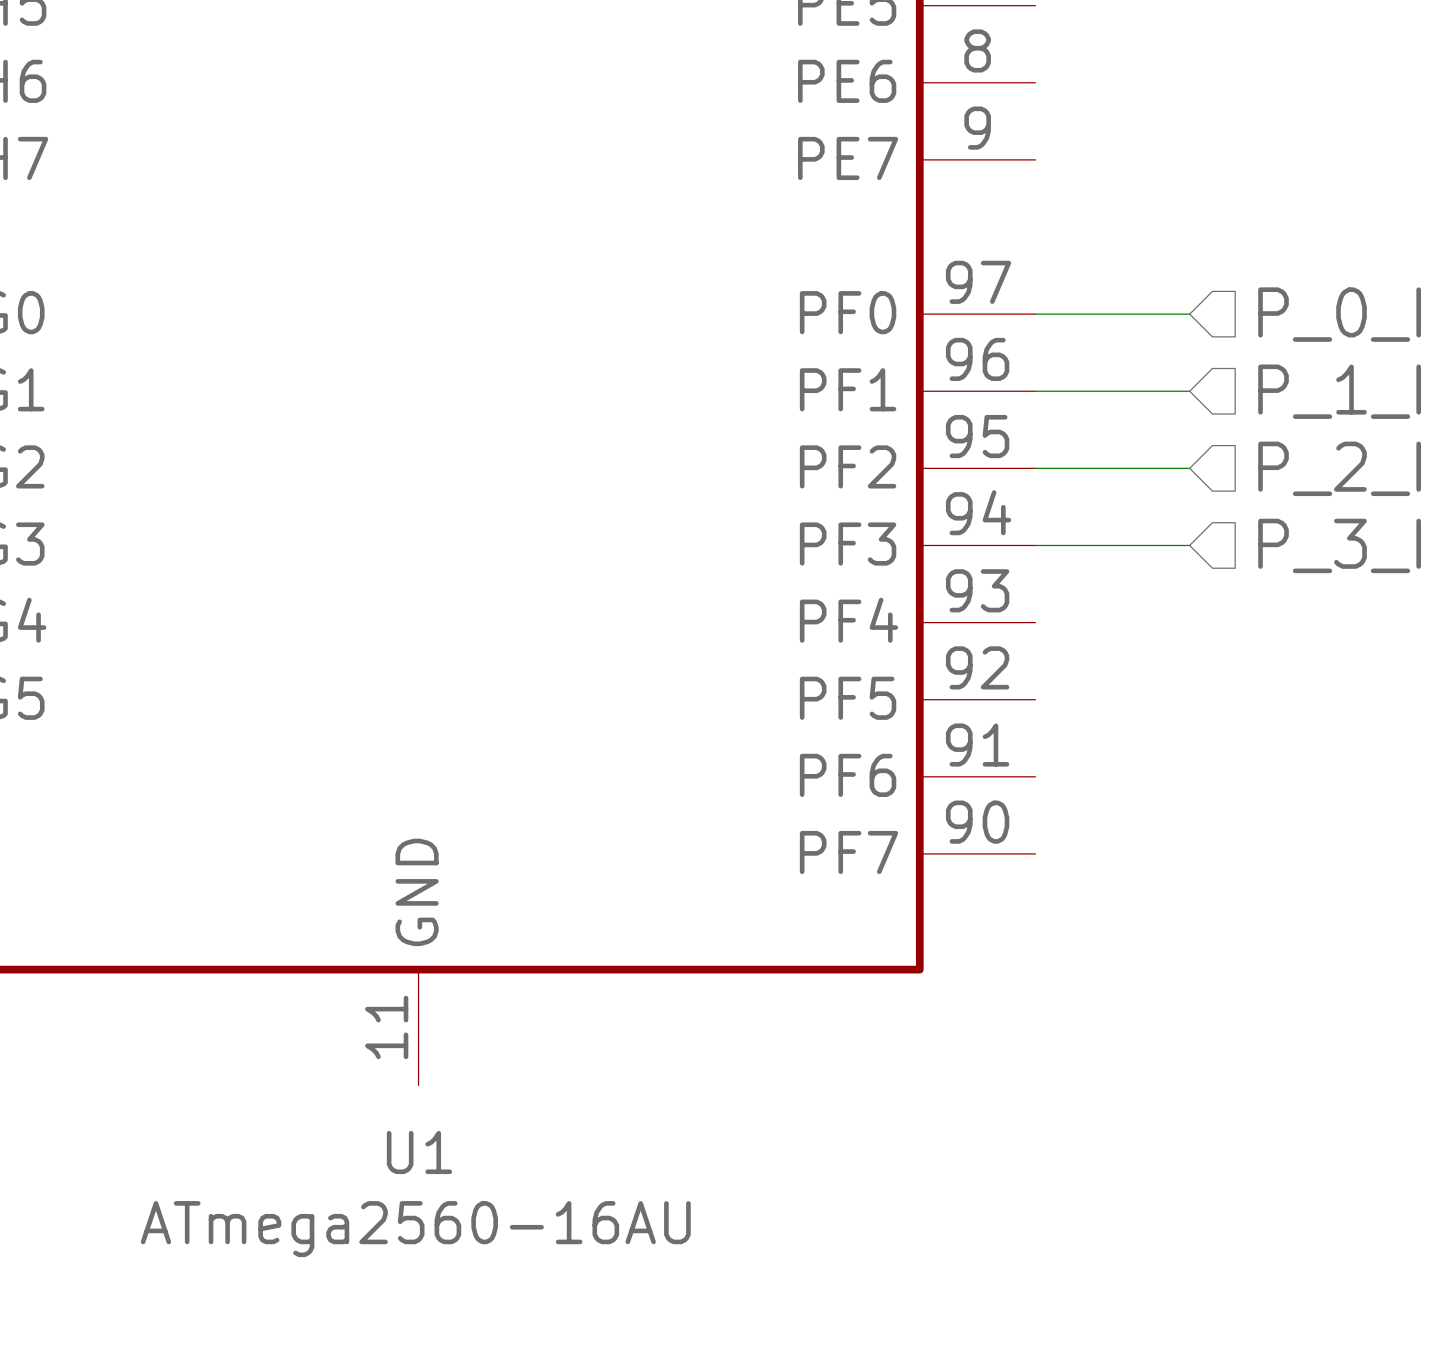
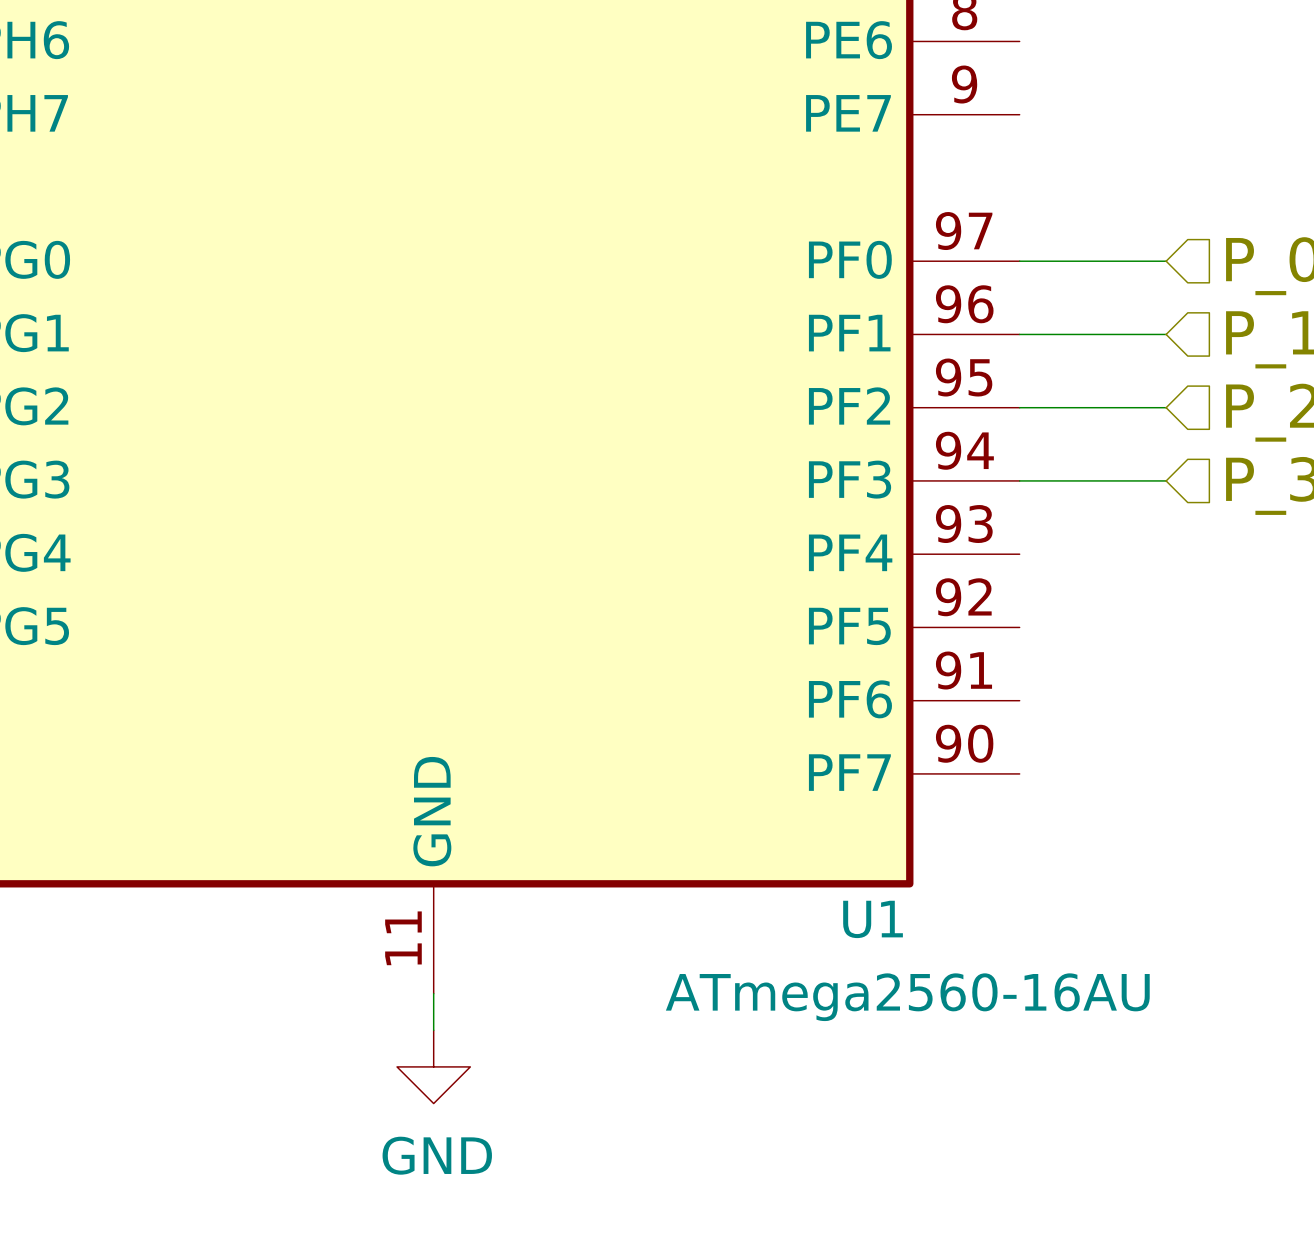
wire: none -> (433, 993) (433, 1030)
U1 name position: U1 (419, 1152) -> U1 (873, 919)
power symbol: none -> GND (433, 1066)
U1 value position: ATmega2560-16AU (415, 1229) -> ATmega2560-16AU (907, 997)

